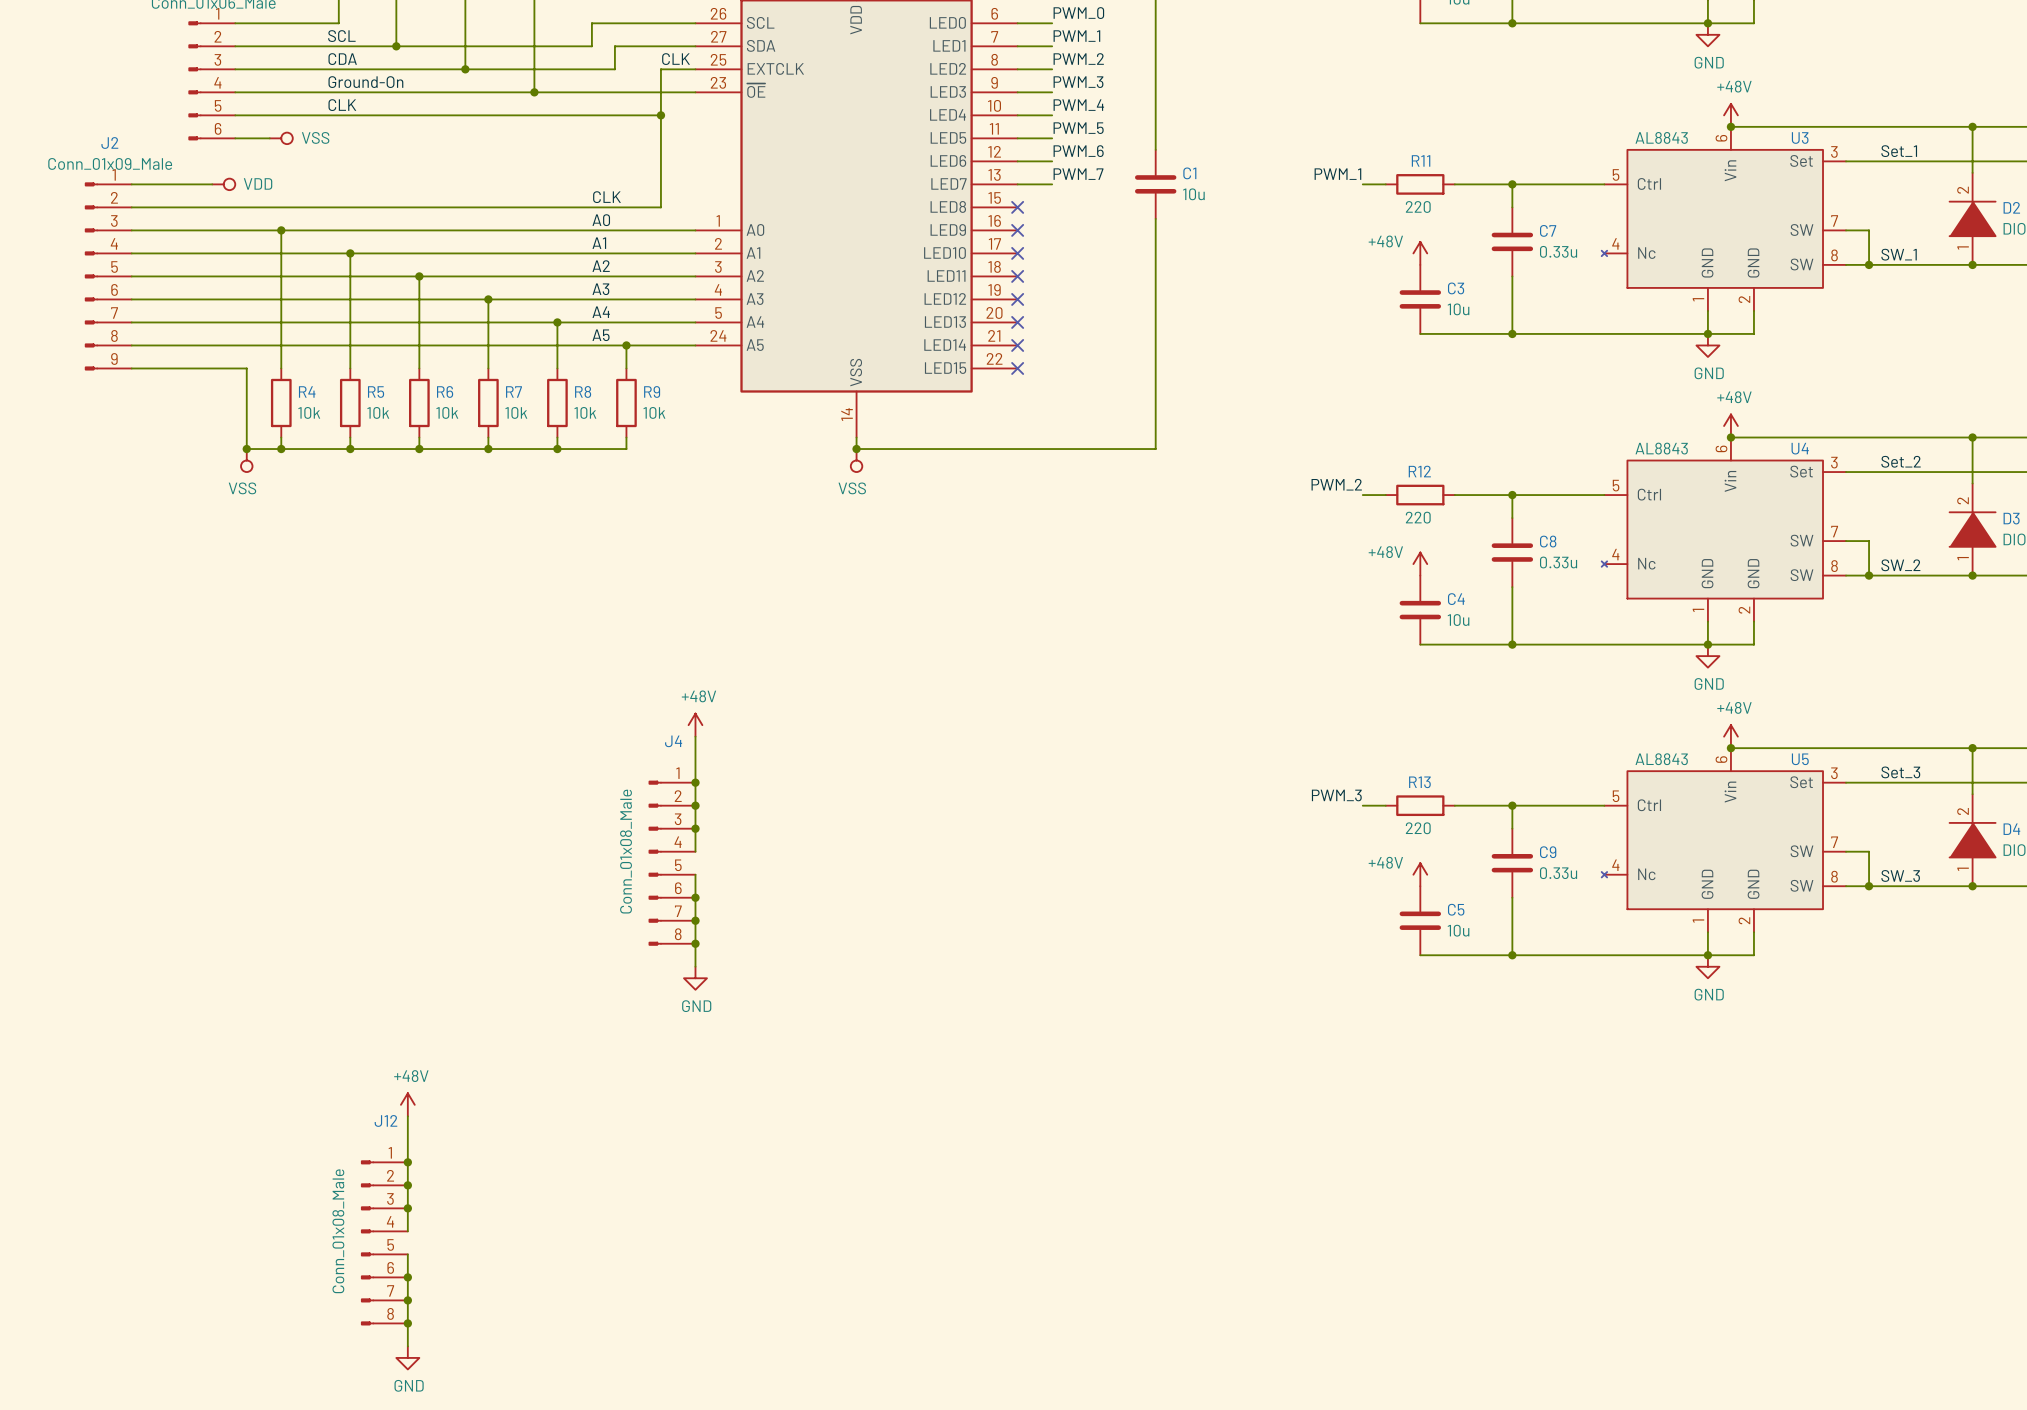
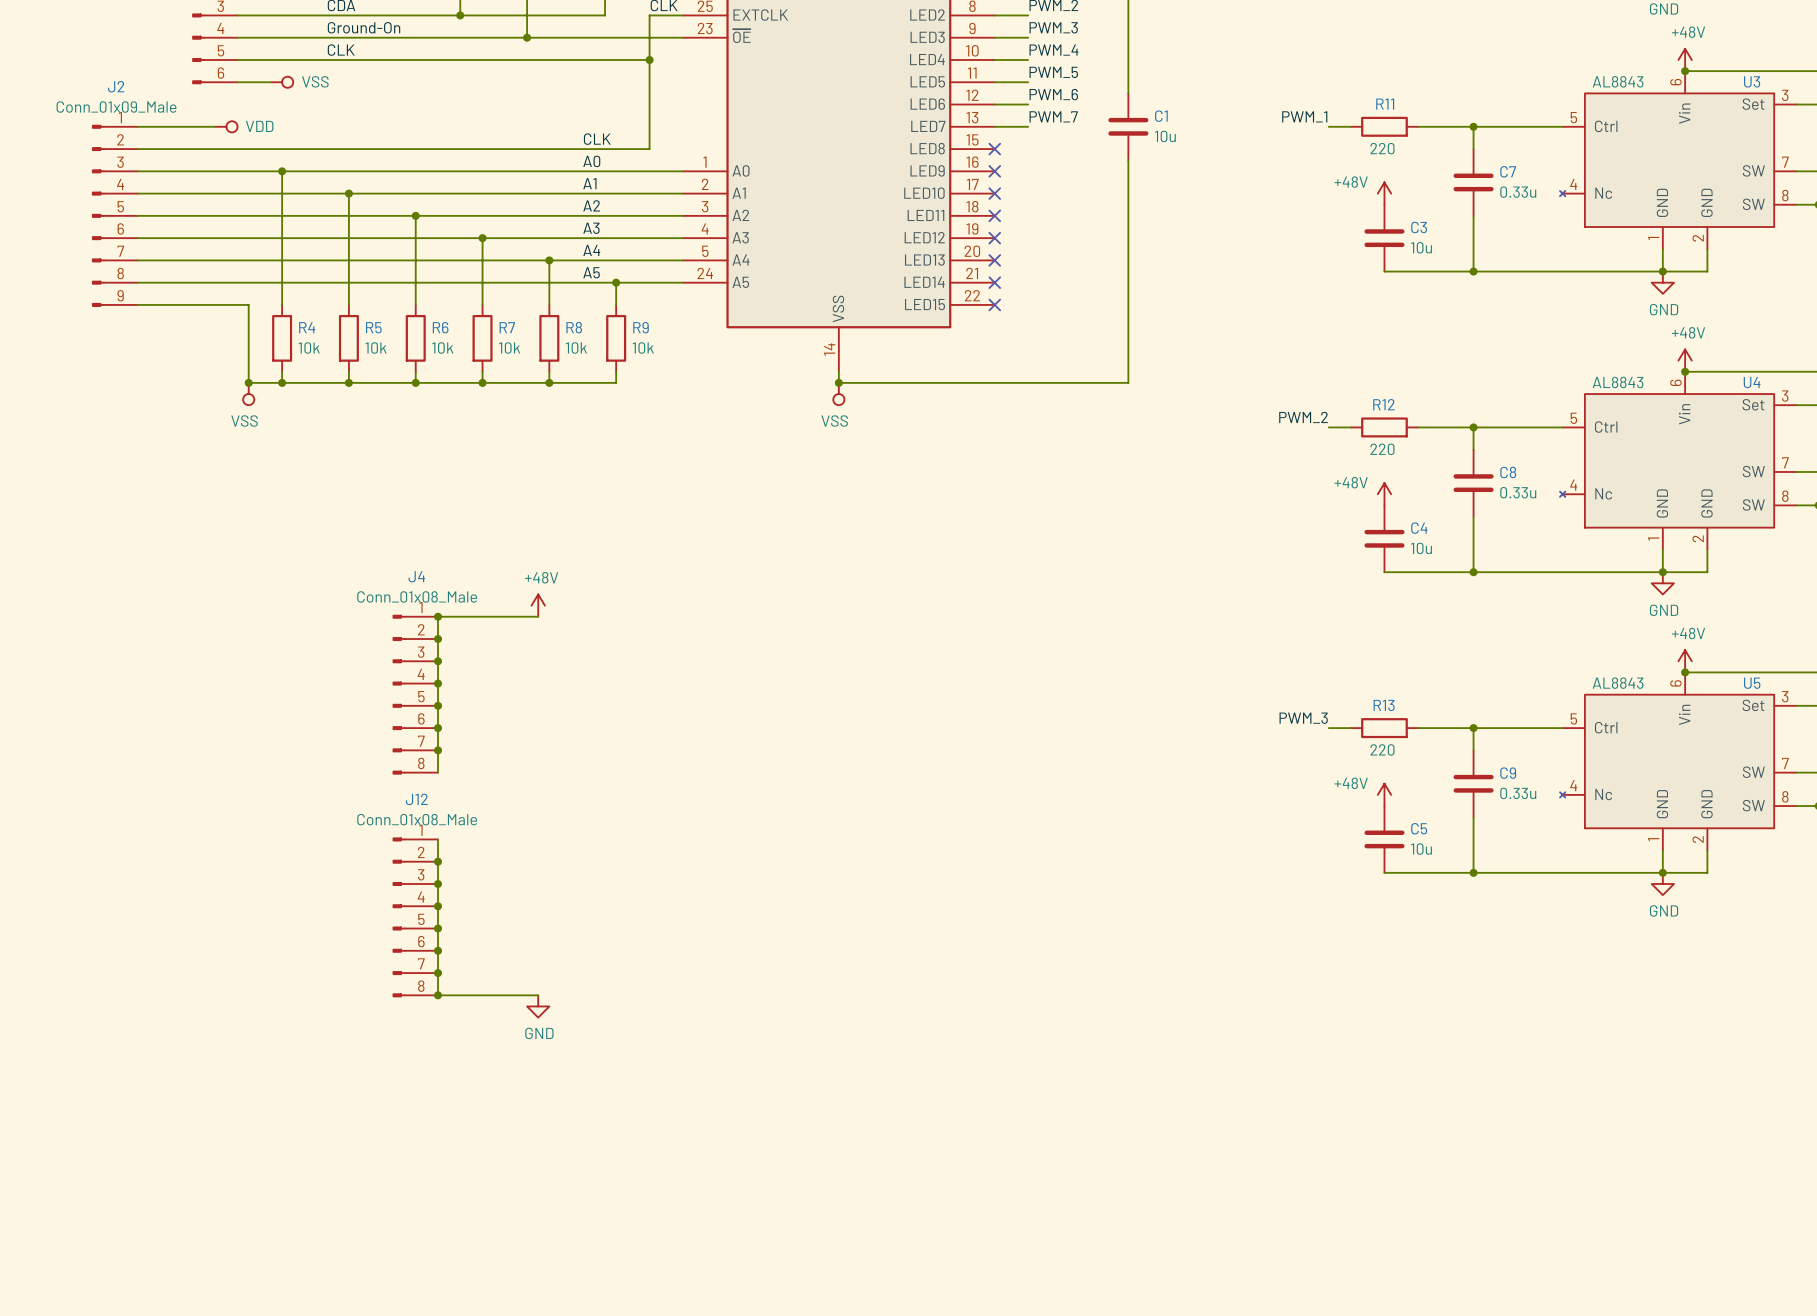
junction: none -> (438, 616)
wire: none -> (538, 616) (438, 616) (438, 772)
junction: none -> (438, 639)
power symbol position: +48V (695, 725) -> +48V (538, 605)
junction: none -> (438, 661)
wire: (695, 736) (695, 851) -> none
junction: none -> (438, 683)
junction: none -> (438, 705)
junction: (695, 782) -> none
junction: none -> (438, 728)
junction: (695, 805) -> none
junction: none -> (438, 750)
junction: (695, 828) -> none
J4 value rotation: 0° (626, 851) -> 90° clockwise (417, 596)
J4 position: (672, 863) -> (415, 694)
wire: (695, 874) (695, 966) -> none
junction: (695, 897) -> none
wire: none -> (438, 839) (438, 995) (538, 995)
junction: (695, 920) -> none
junction: none -> (438, 861)
junction: (695, 943) -> none
junction: none -> (438, 883)
power symbol: GND (695, 978) -> none
junction: none -> (438, 906)
junction: none -> (438, 928)
junction: none -> (438, 950)
junction: none -> (438, 973)
junction: none -> (438, 995)
power symbol: none -> GND (538, 1006)
power symbol: +48V (407, 1104) -> none
wire: (407, 1116) (407, 1231) -> none
junction: (407, 1162) -> none
junction: (407, 1185) -> none
junction: (407, 1208) -> none
J12 value rotation: 0° (338, 1231) -> 90° clockwise (417, 819)
J12 position: (384, 1242) -> (415, 917)
wire: (407, 1254) (407, 1346) -> none
junction: (407, 1277) -> none
junction: (407, 1300) -> none
junction: (407, 1323) -> none
power symbol: GND (407, 1357) -> none

